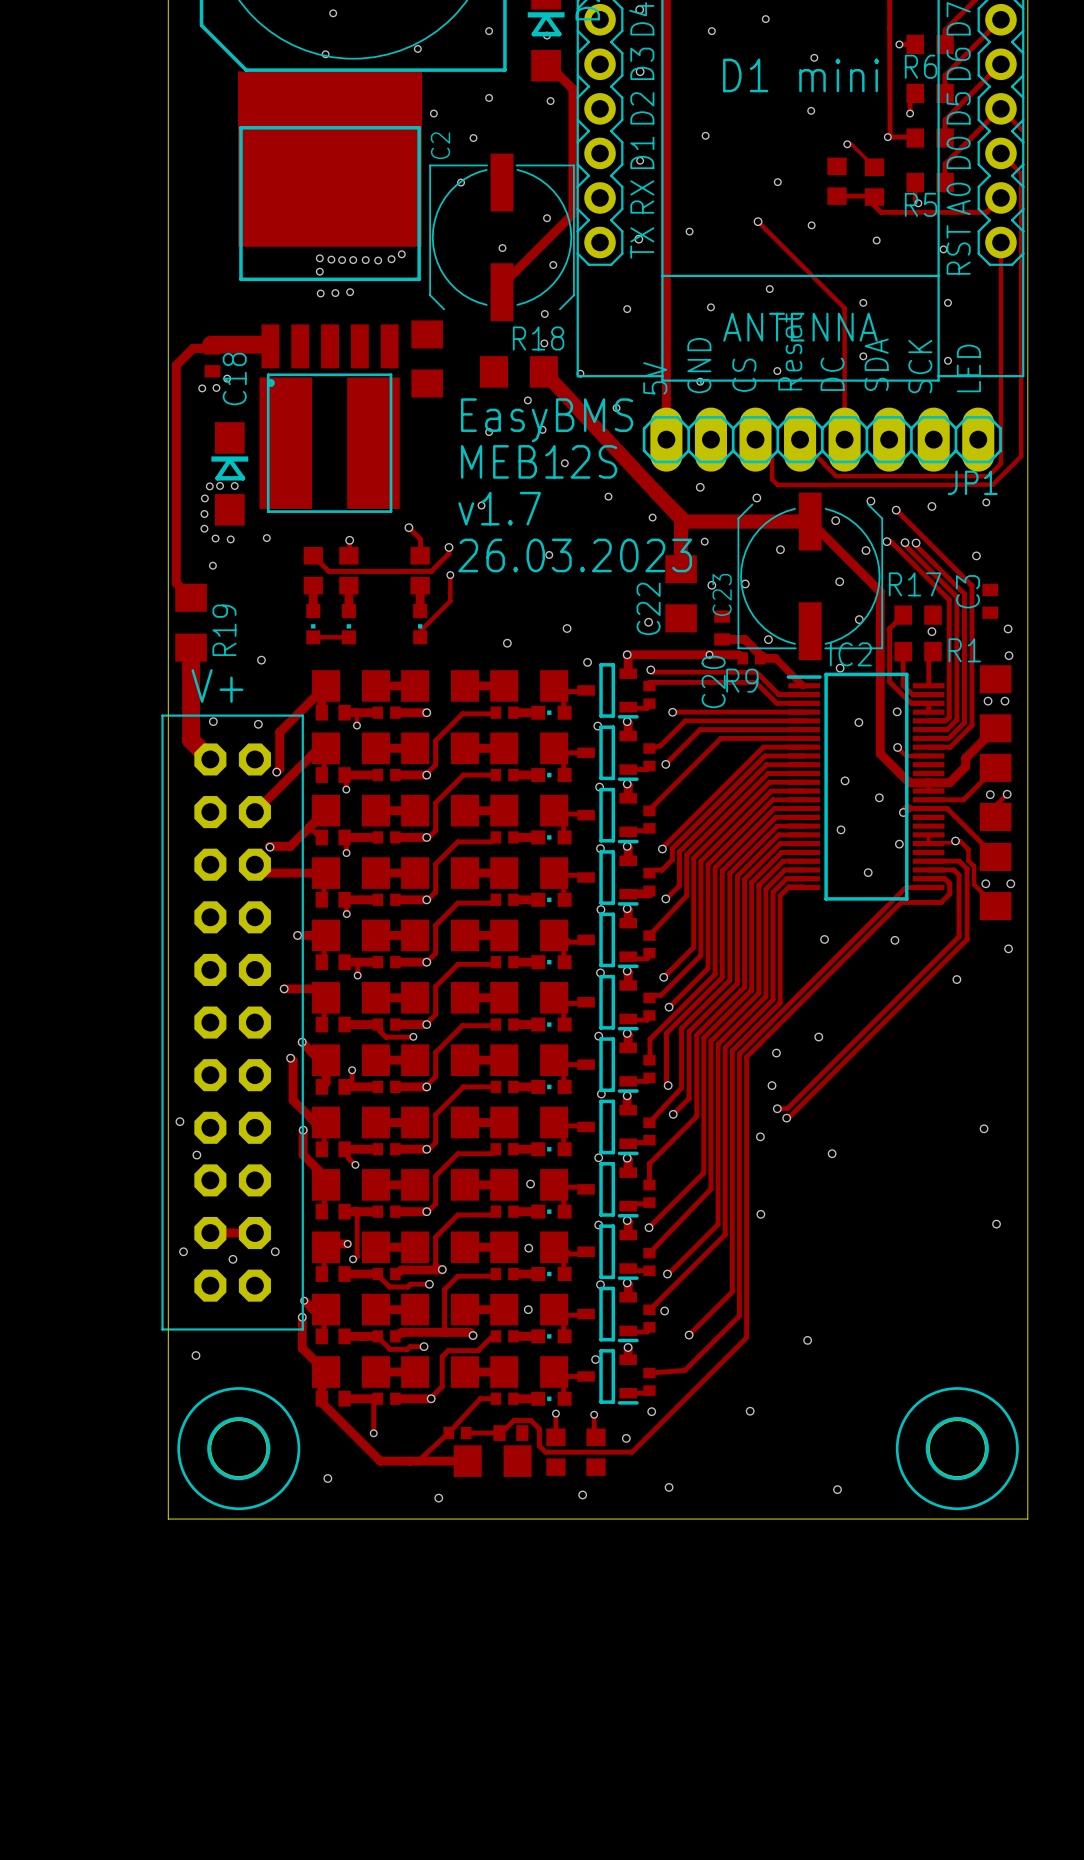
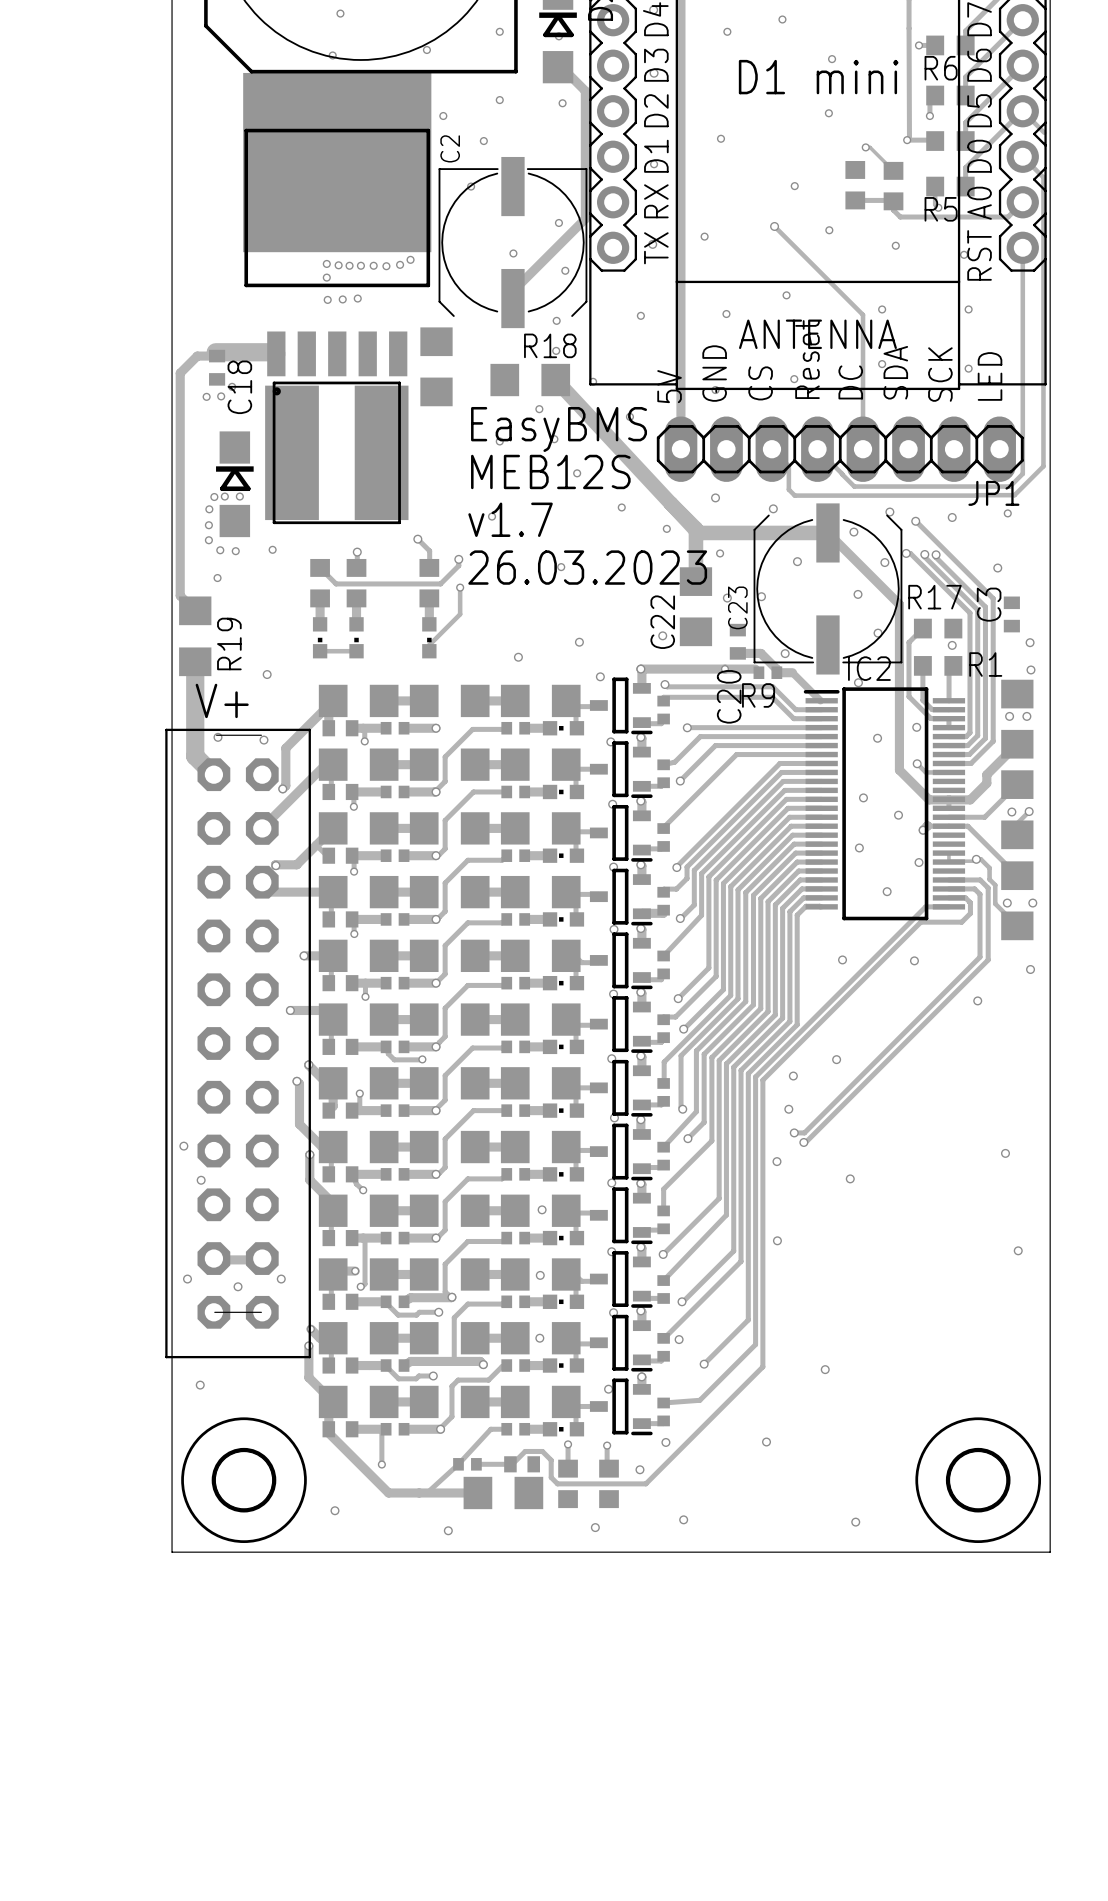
part footprint: [161, 714, 304, 1331] -> [165, 728, 311, 1359]

